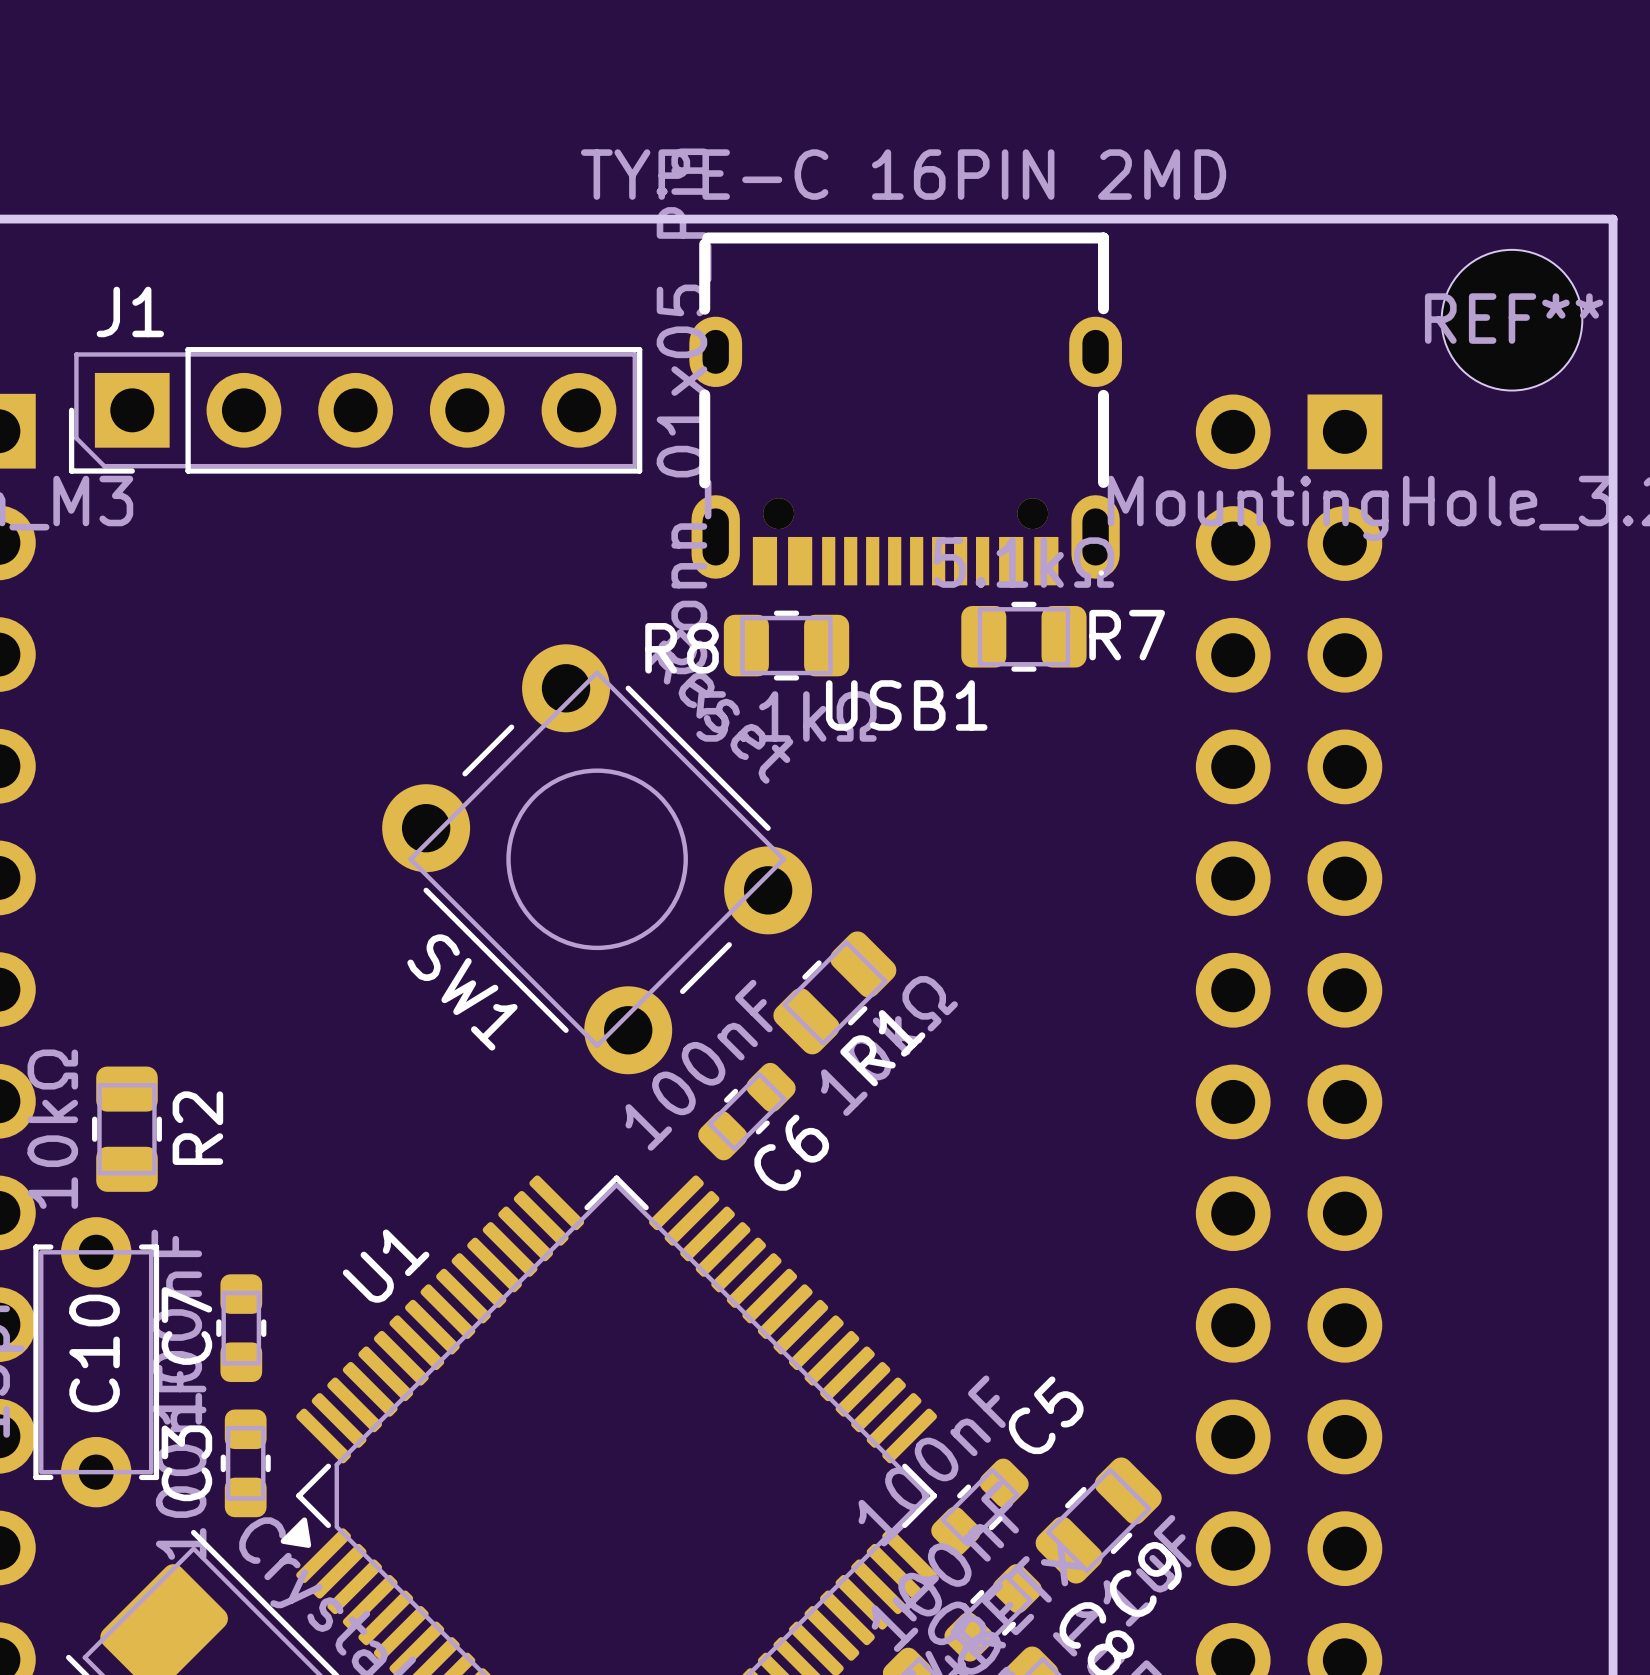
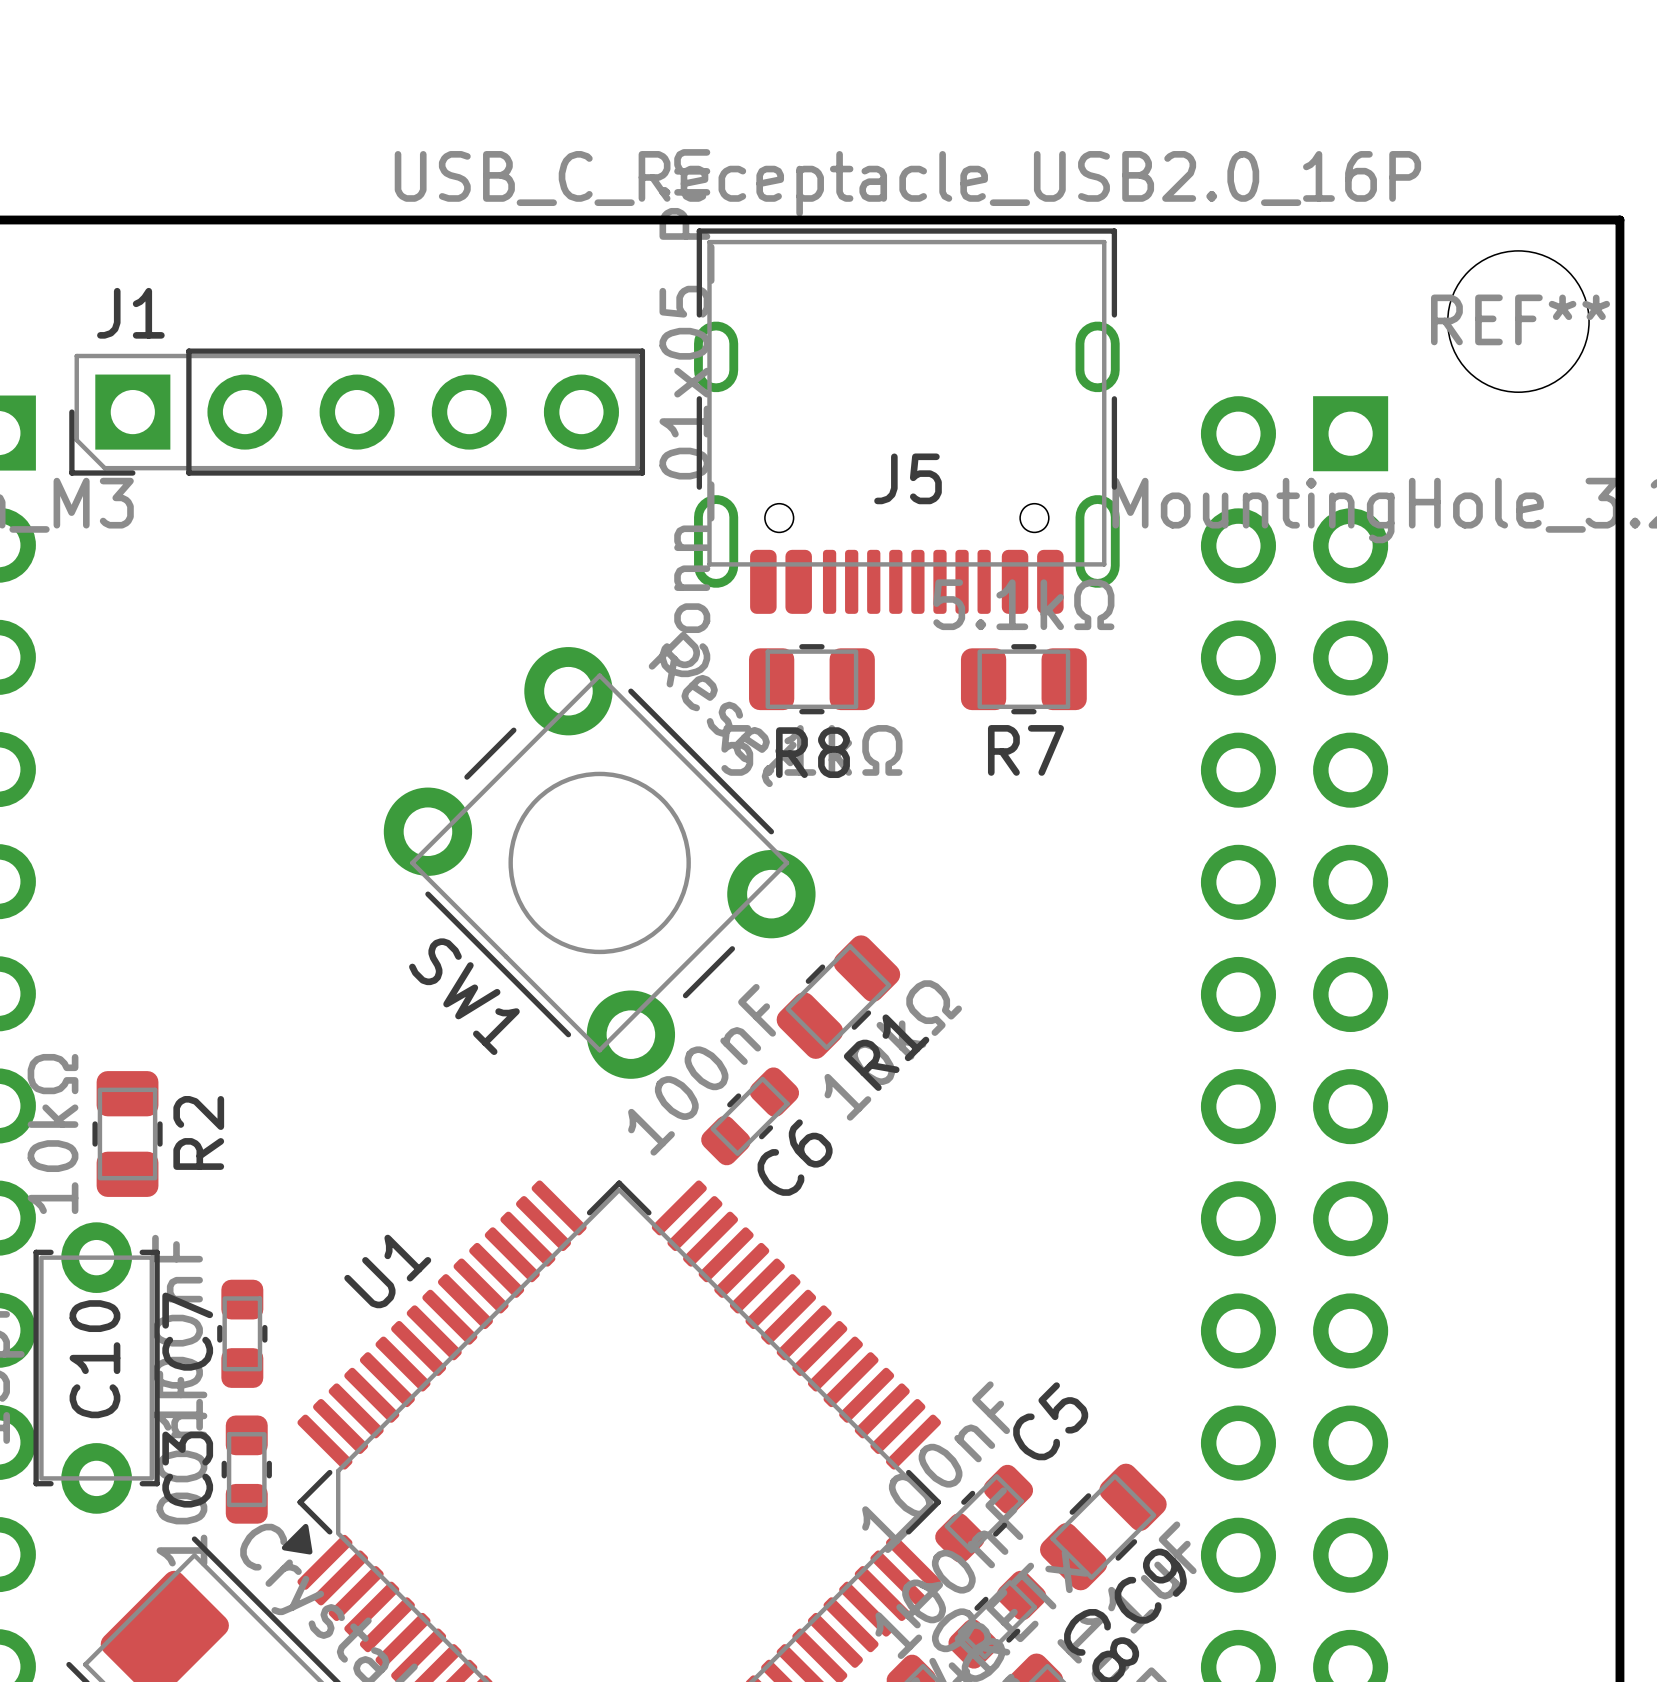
USB1: TYPE-C 16PIN 2MD (905, 408) -> none
J5: none -> USB_C_Receptacle_USB2.0_16P (906, 421)
R7 name position: R7 (1127, 635) -> R7 (1025, 750)
R7 position: (1023, 636) -> (1023, 679)
R8 position: (786, 645) -> (811, 679)
R8 name position: R8 (682, 648) -> R8 (812, 752)

